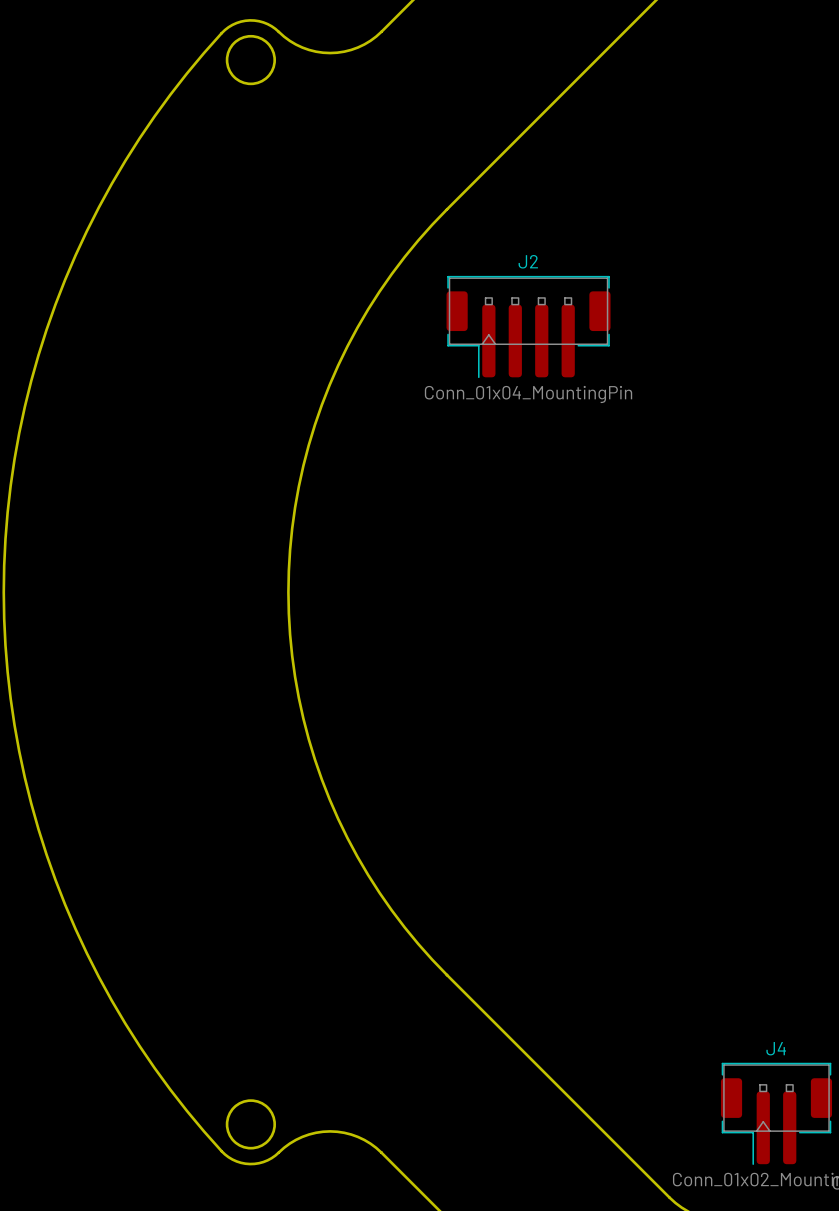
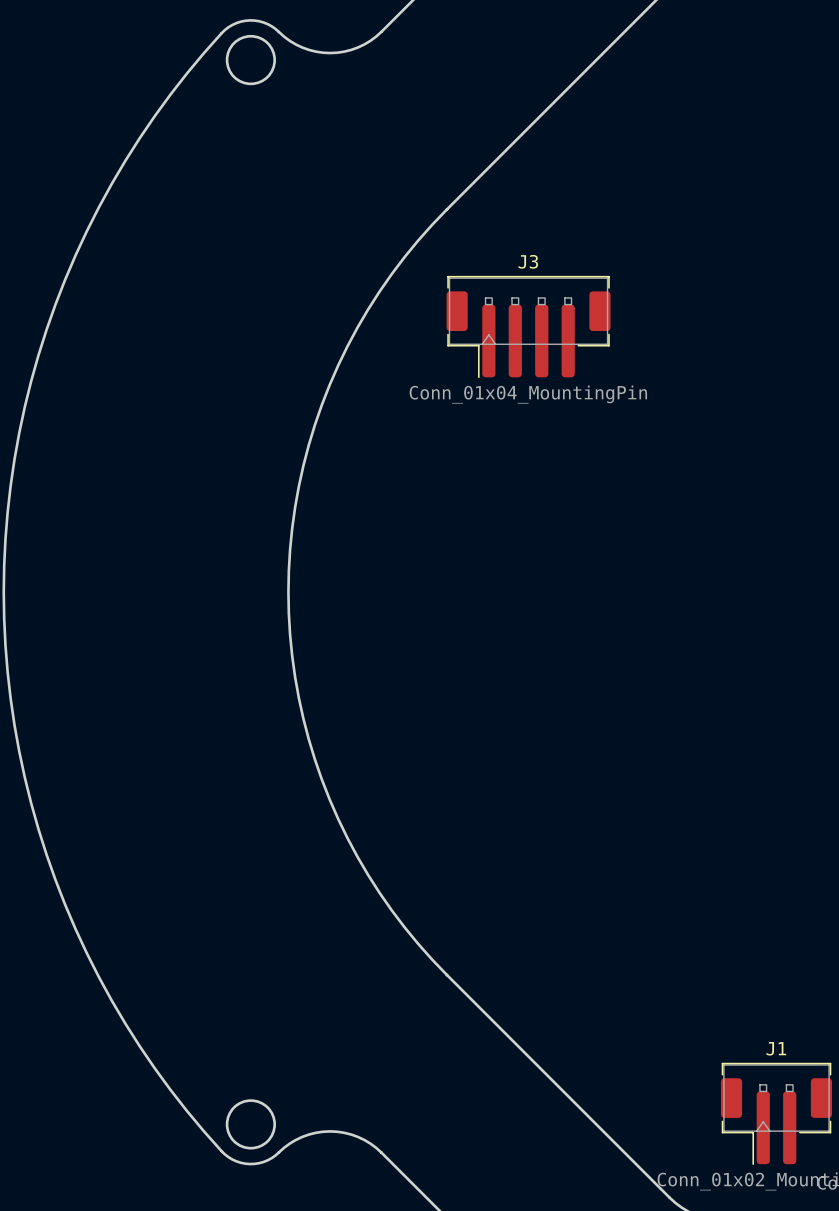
J2 name: J2 (528, 261) -> J3 (528, 261)
J4 name: J4 (776, 1048) -> J1 (776, 1048)

